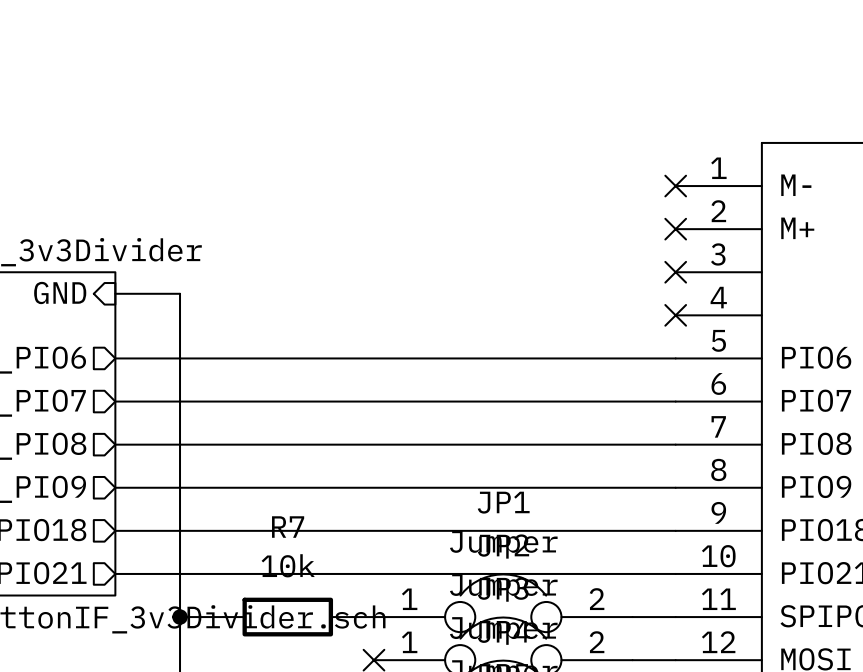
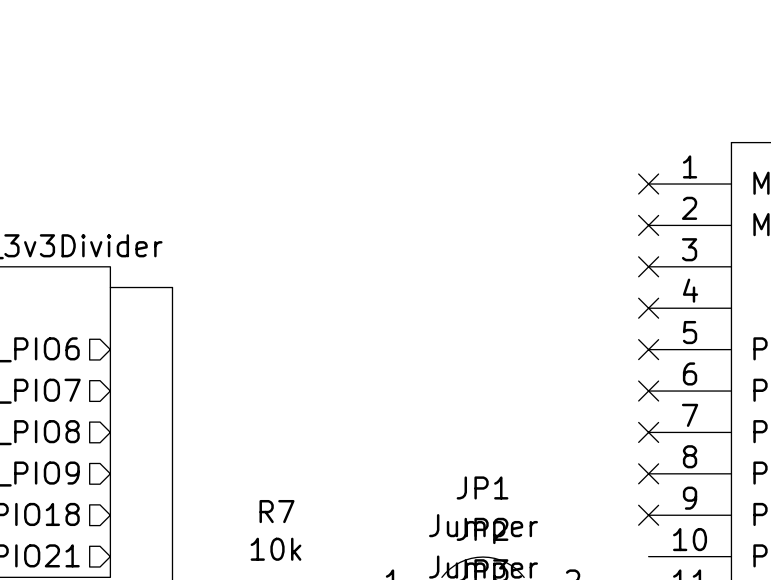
sheet pin: GND (60, 292) -> none
wire: (115, 358) (675, 358) -> none
no-connect mark: none -> (648, 349)
wire: (115, 401) (675, 401) -> none
no-connect mark: none -> (648, 391)
wire: (115, 444) (675, 444) -> none
no-connect mark: none -> (648, 432)
wire: (115, 487) (675, 487) -> none
no-connect mark: none -> (648, 473)
wire: (115, 530) (675, 530) -> none
no-connect mark: none -> (648, 515)
wire: (115, 573) (675, 573) -> none

